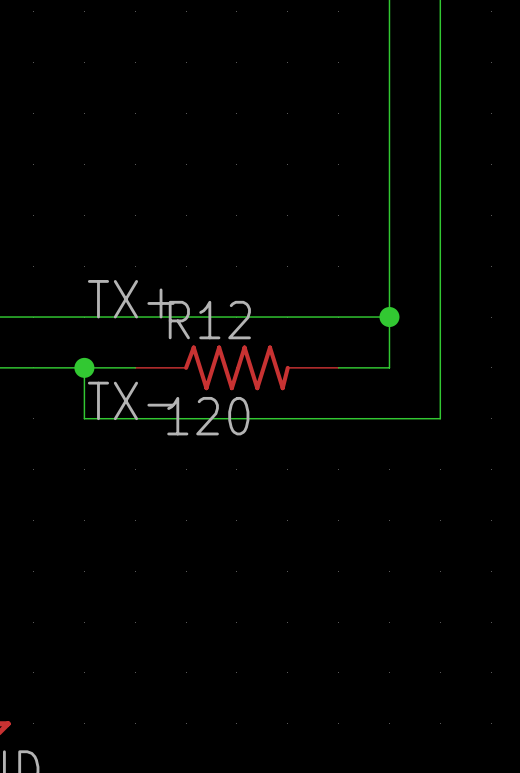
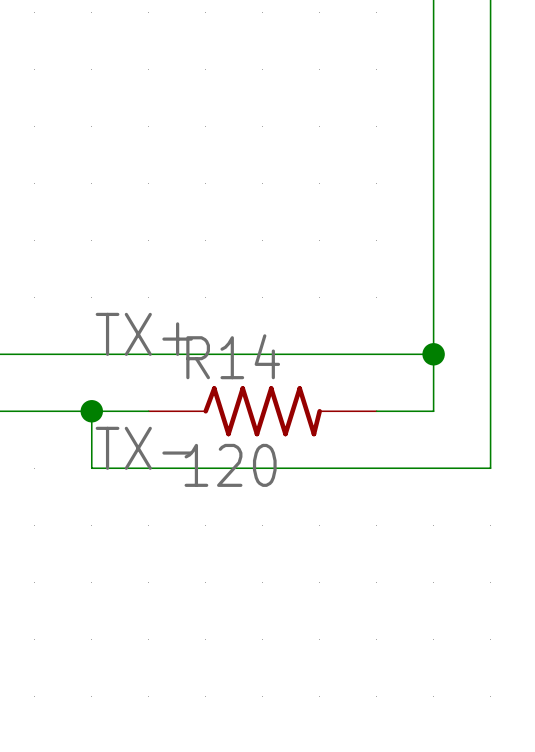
R12 name: R12 (209, 320) -> R14 (233, 356)

